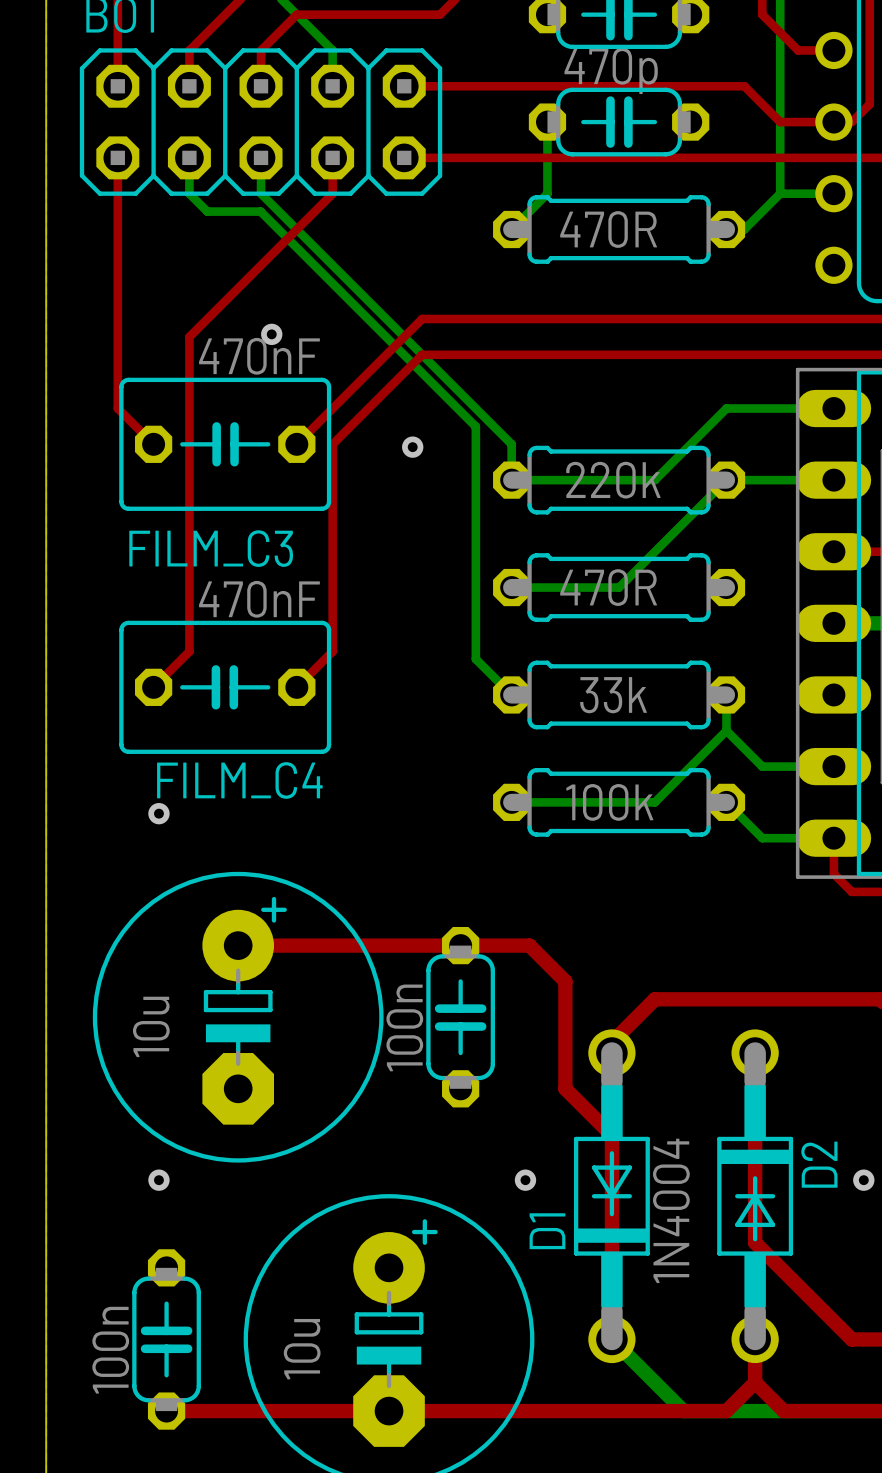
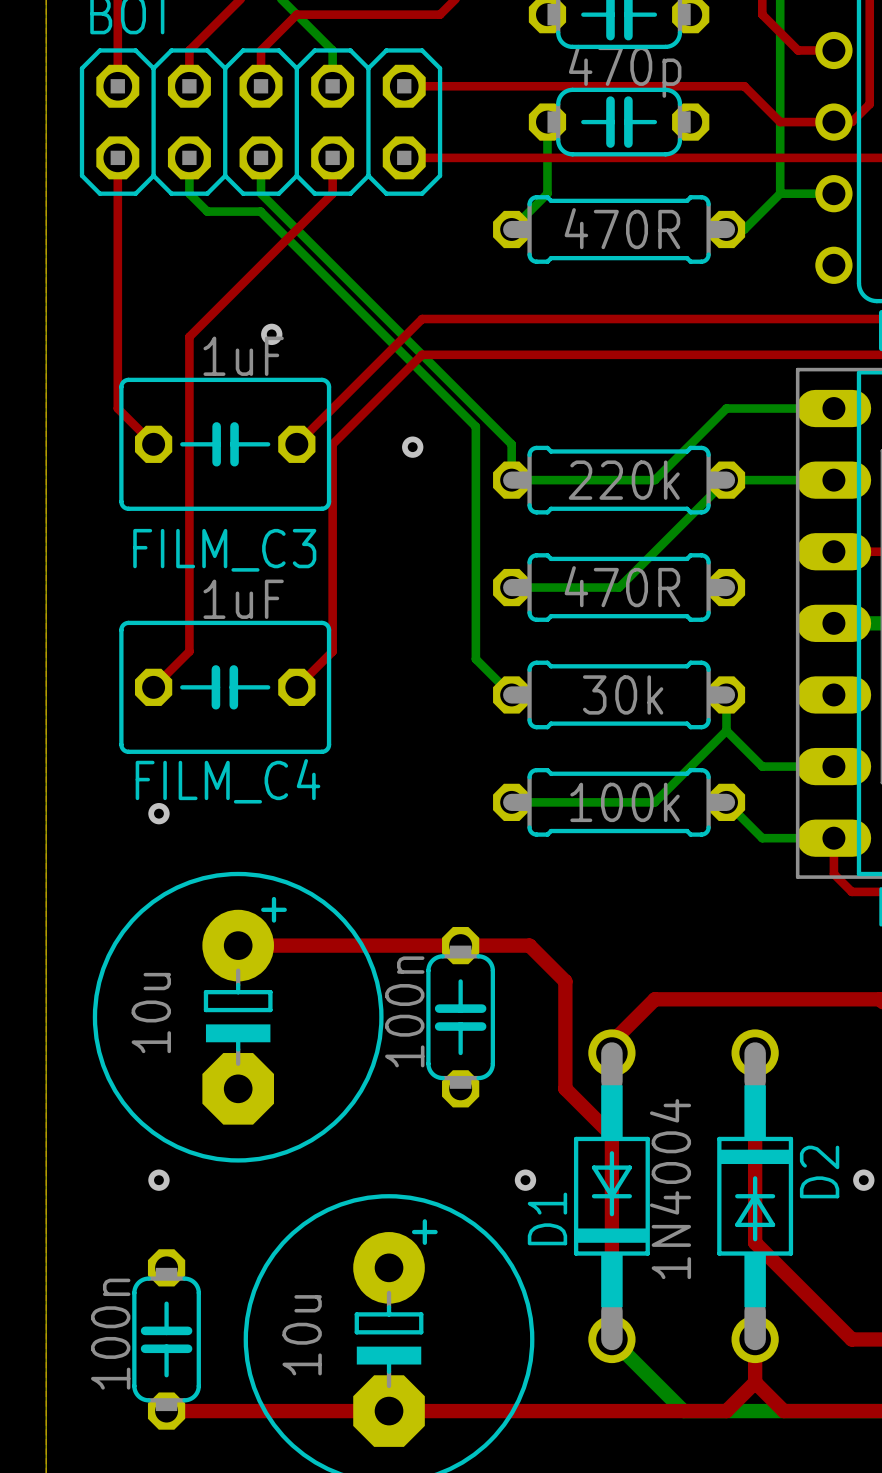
FILM_C3 value: 470nF (259, 356) -> 1uF (243, 356)
FILM_C4 value: 470nF (259, 599) -> 1uF (243, 599)
part value: 33k (613, 695) -> 30k (623, 694)

